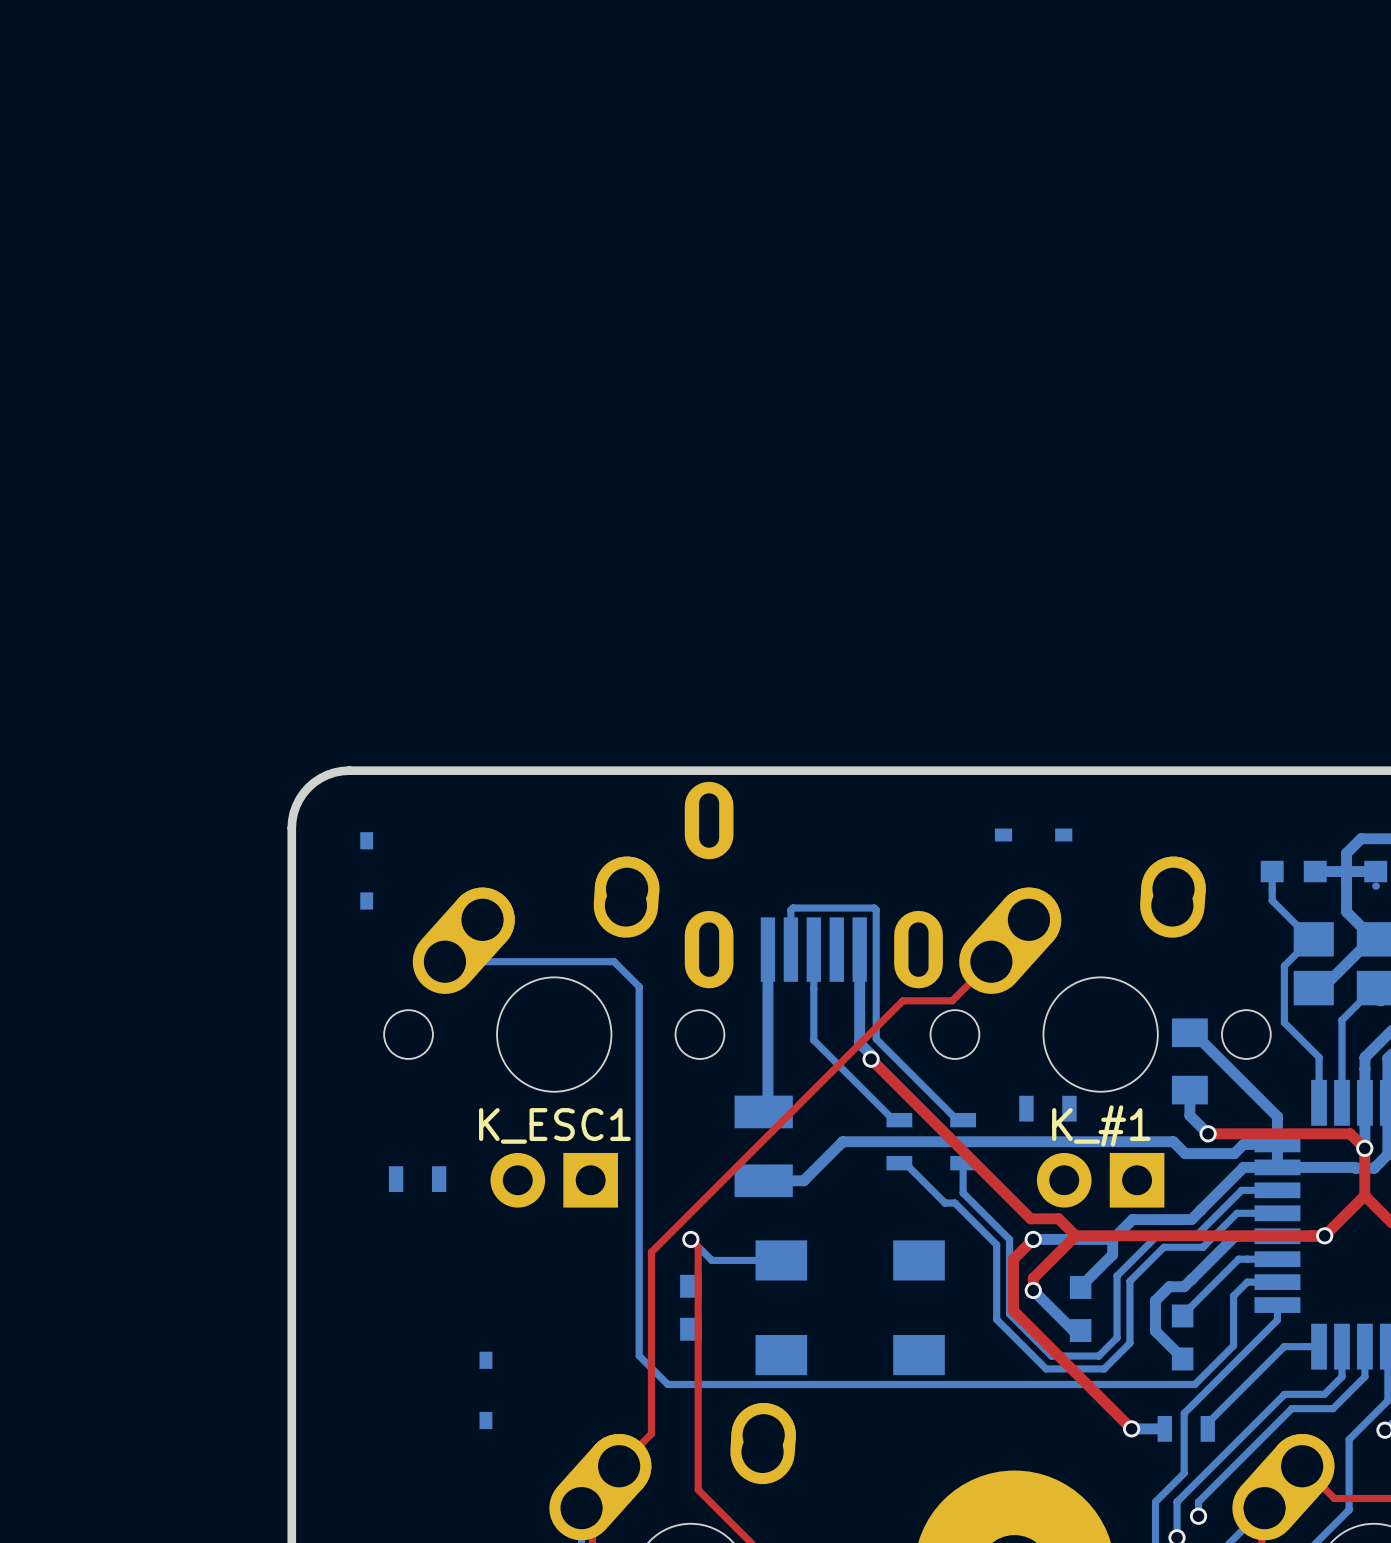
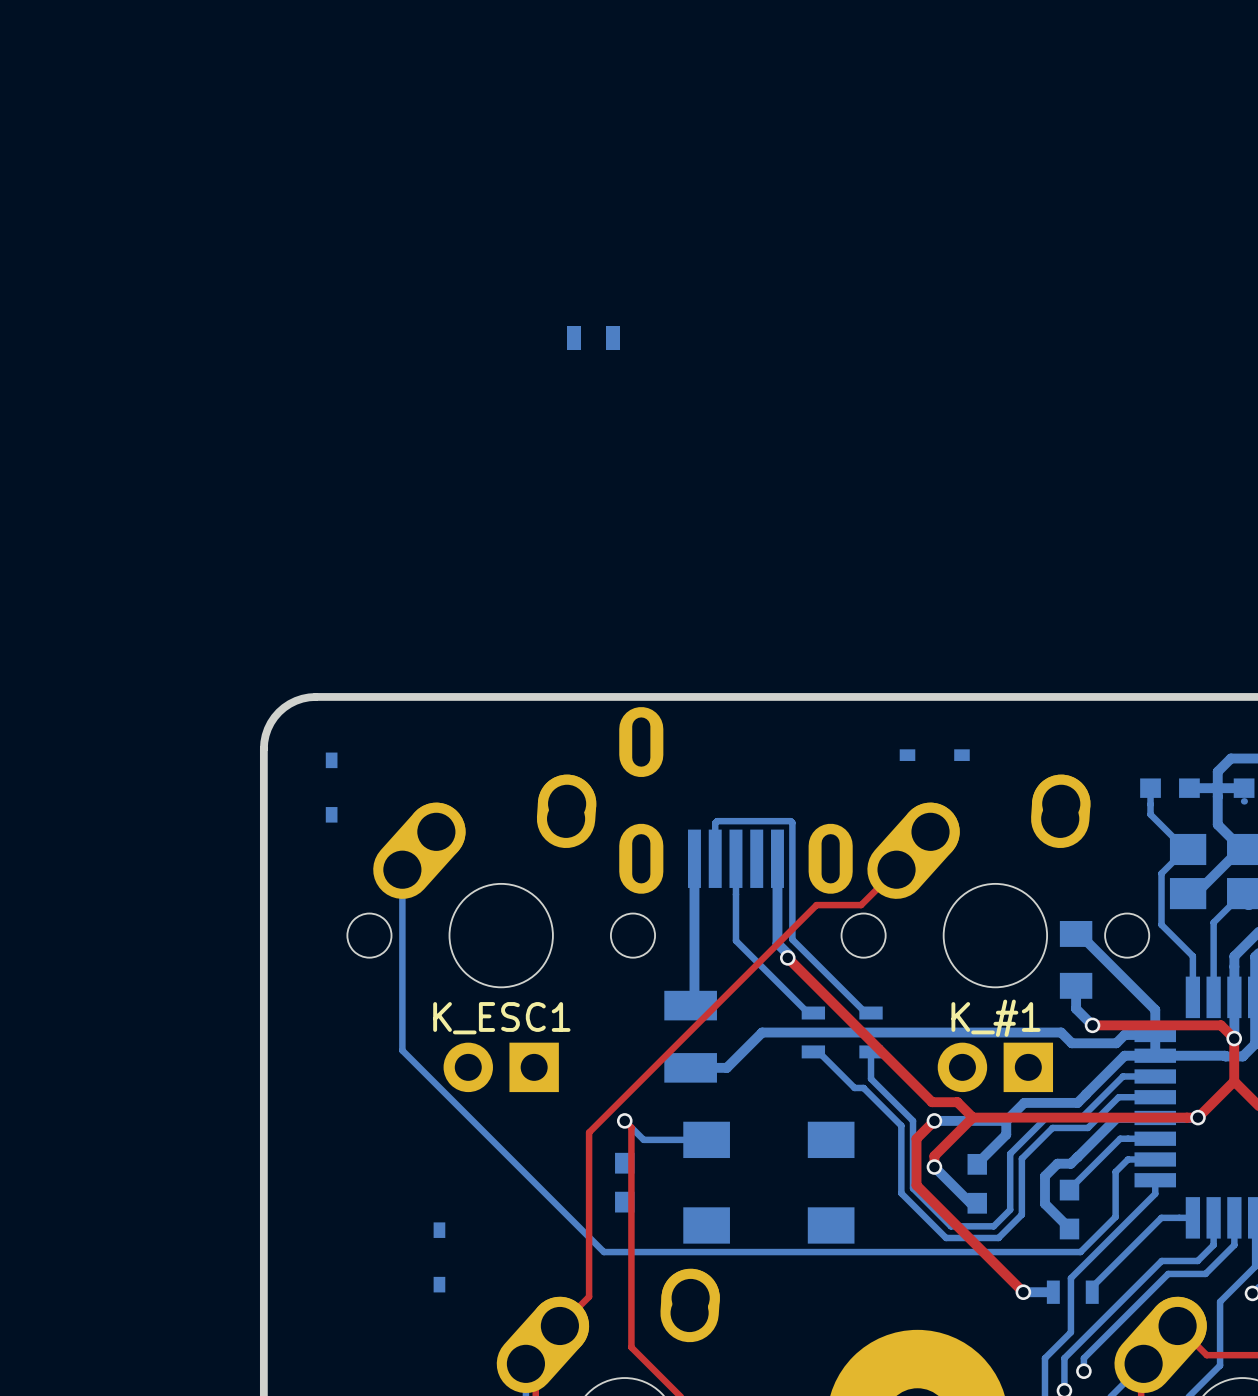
part: none -> (593, 337)
bottom track: (444, 961) (614, 961) (639, 986) (639, 1355) -> (402, 869) (402, 1050) (578, 1226)
part: (1047, 1108) -> none
part: (417, 1179) -> none

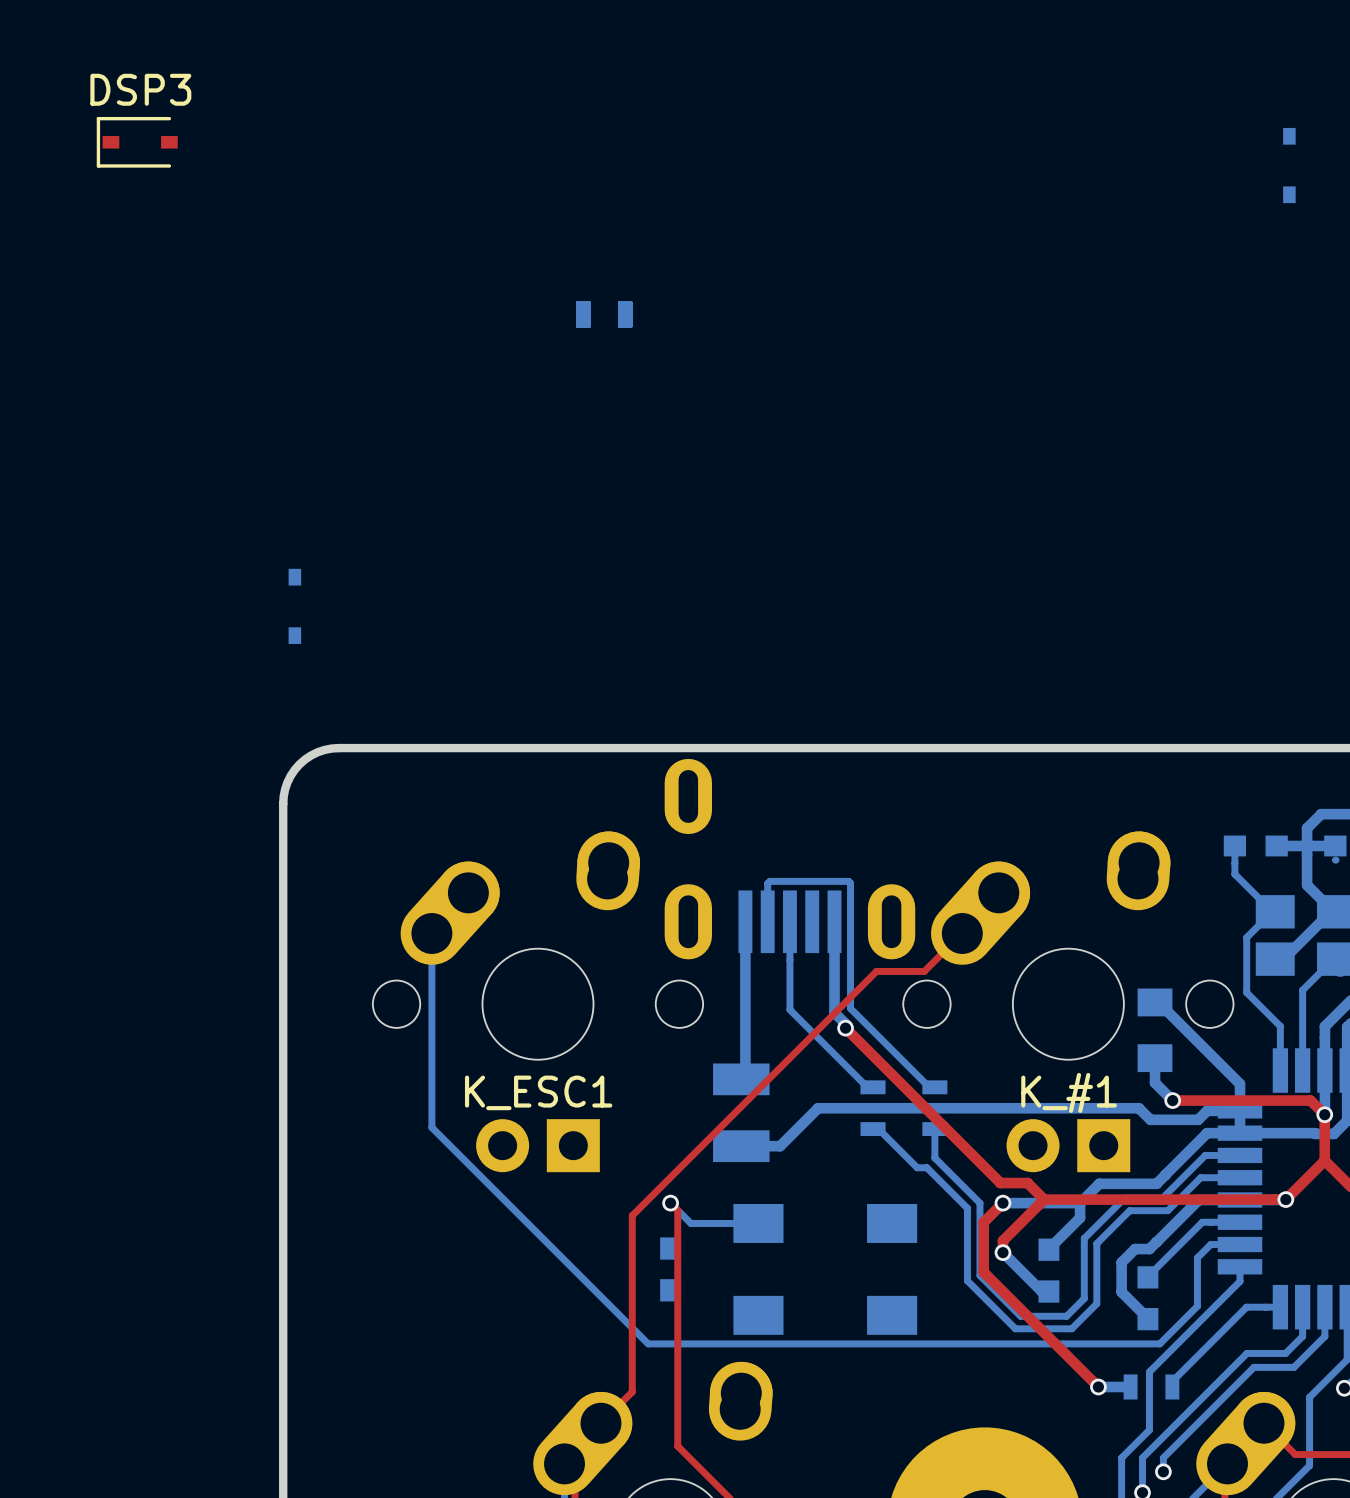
DSP3: none -> (137, 142)
part: none -> (1289, 165)
part position: (593, 337) -> (604, 314)
part: (934, 755) -> none
part position: (331, 787) -> (294, 606)
part: (439, 1257) -> none

